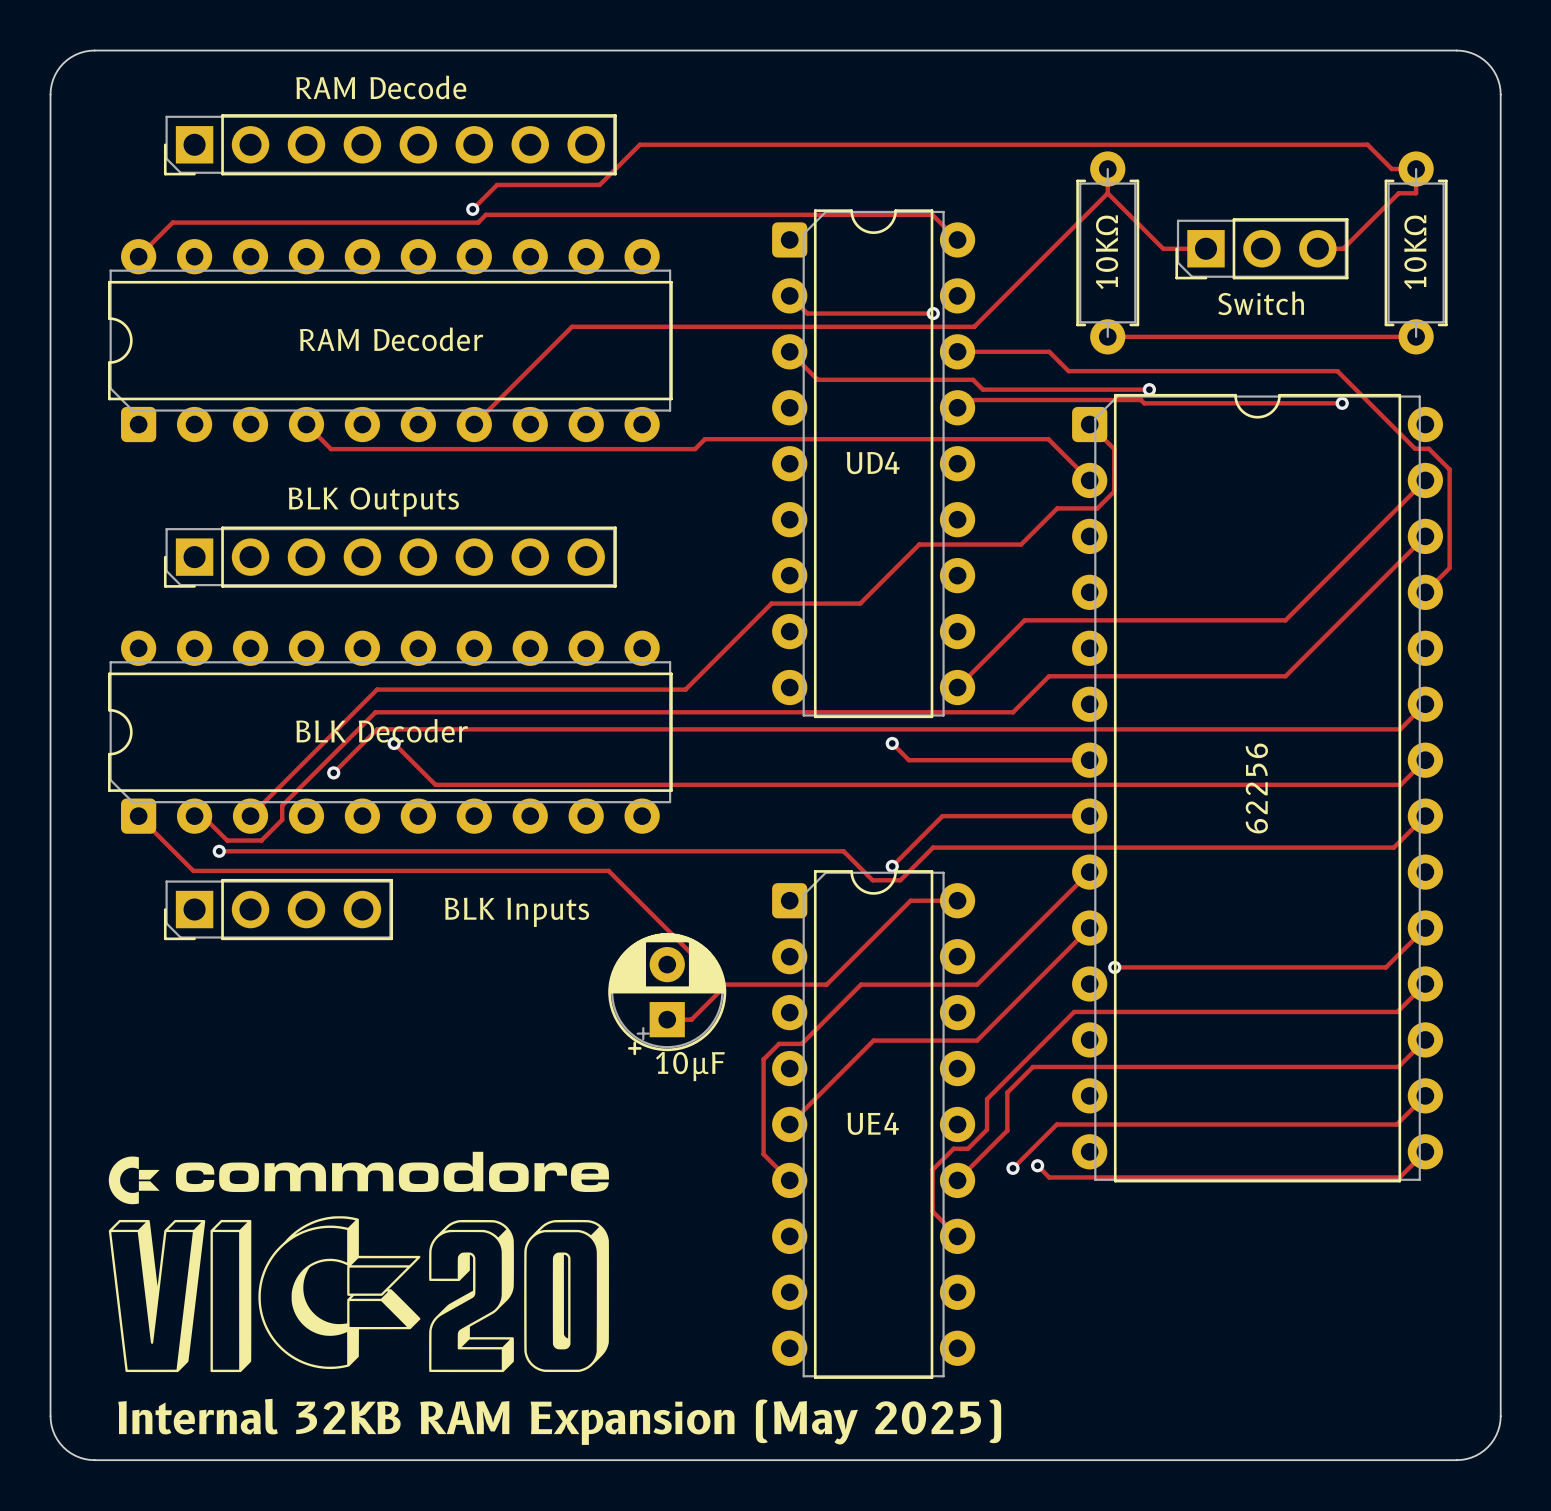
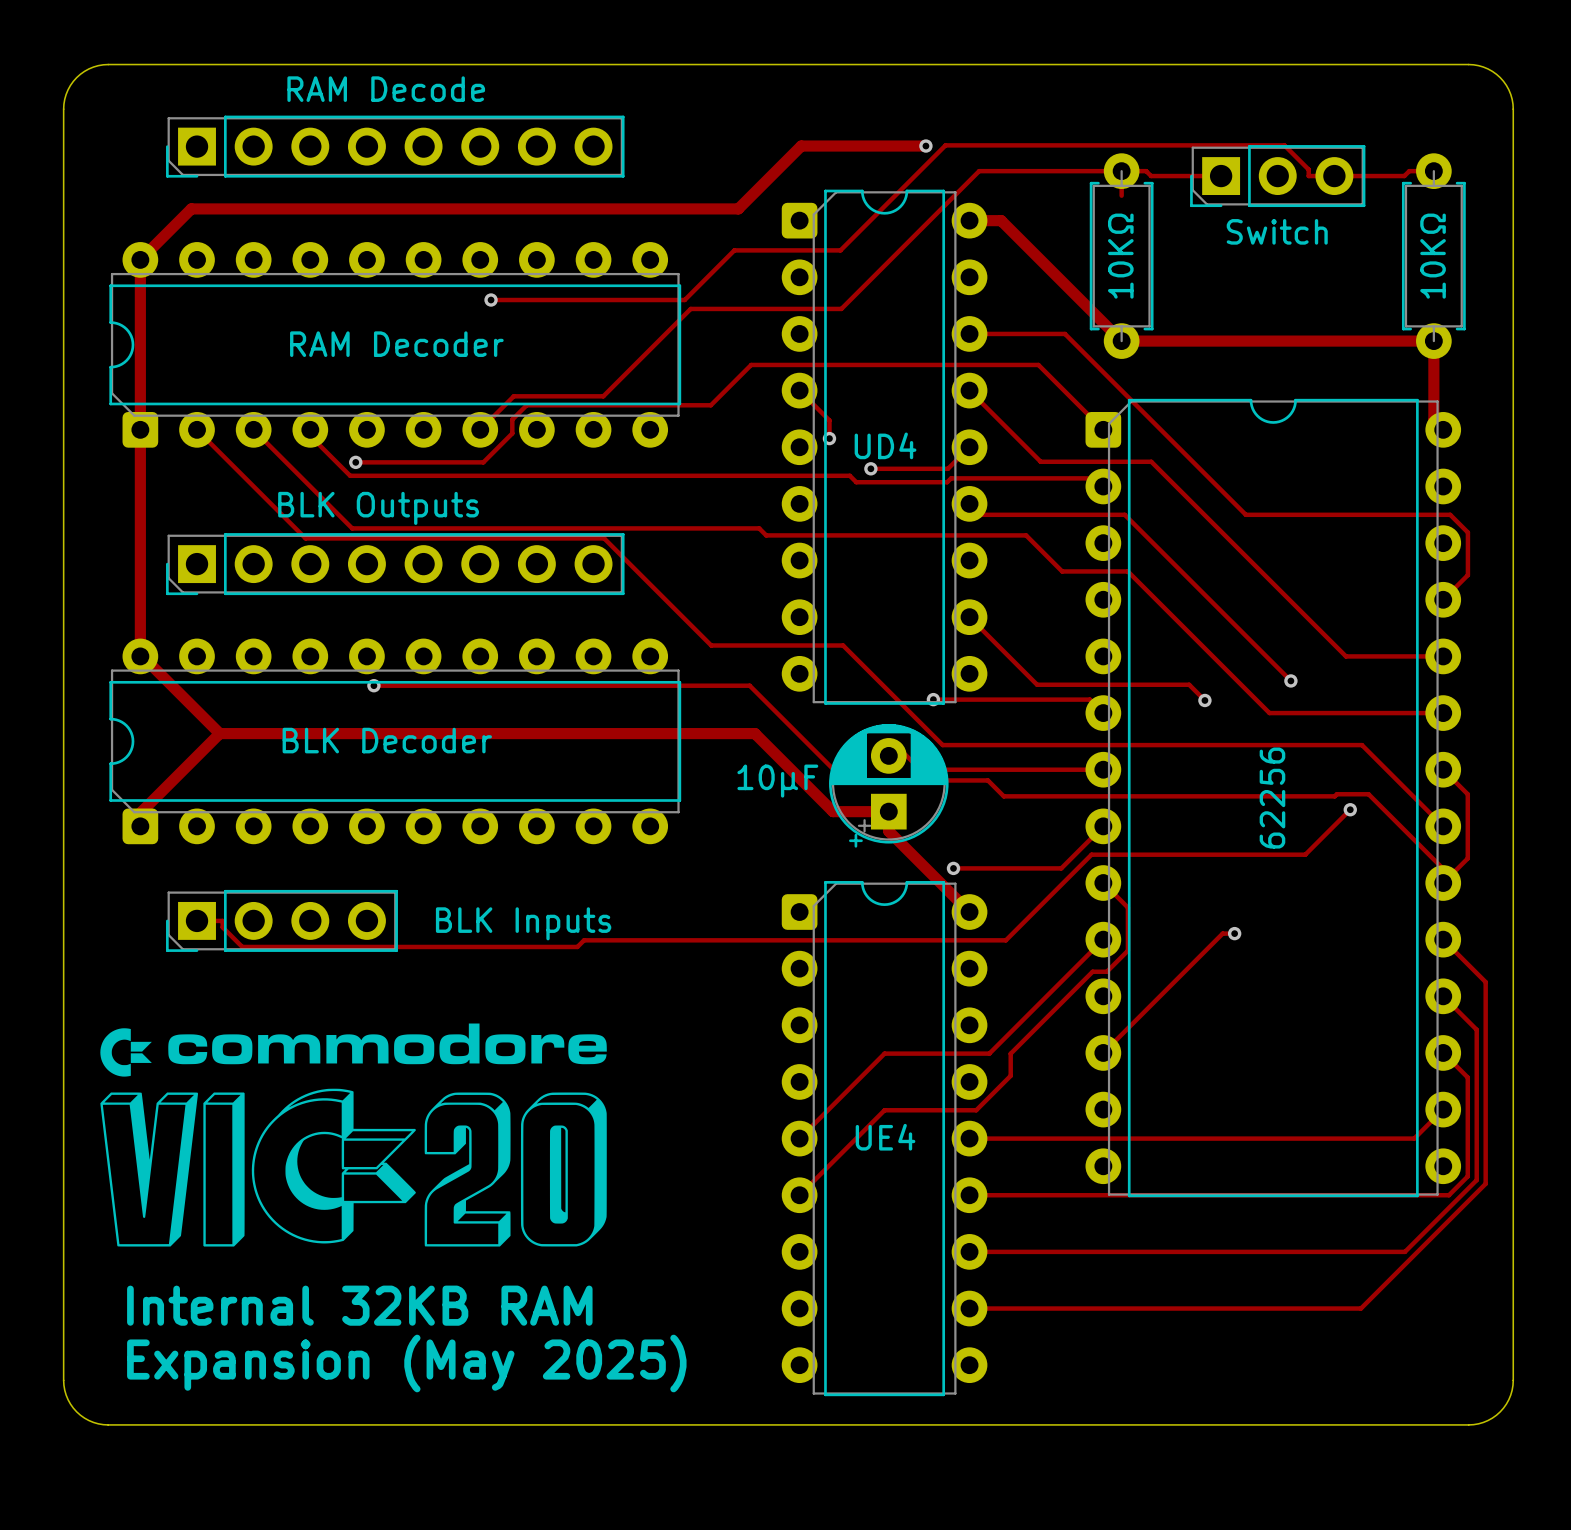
board edge: (94, 50) (1456, 50) (1471, 53) (1487, 63) (1498, 80) (1500, 94) (1500, 1416) (1498, 1430) (1487, 1447) (1471, 1457) (1456, 1460) (94, 1460) (75, 1455) (63, 1447) (54, 1435) (50, 1416) (50, 94) (54, 75) (63, 63) (80, 53) (94, 50) -> (108, 64) (88, 68) (76, 77) (66, 94) (63, 109) (63, 1380) (66, 1395) (76, 1411) (93, 1422) (108, 1424) (1468, 1424) (1483, 1422) (1500, 1411) (1510, 1395) (1513, 1380) (1513, 109) (1510, 94) (1500, 77) (1488, 68) (1468, 64) (108, 64)
via: none -> (925, 146)
track: (1391, 169) (1367, 144) (639, 144) (599, 184) (497, 184) (472, 209) -> (1409, 171) (1404, 176) (1308, 176) (1308, 169) (1284, 145) (945, 145) (840, 250) (734, 250) (684, 300) (491, 300)
track: (1416, 169) (1416, 193) (1398, 193) (1343, 248) (1317, 248) -> none
via position: (472, 209) -> (491, 300)
track: none -> (969, 220) (1001, 220) (1121, 341)
track: (172, 222) (478, 222) (486, 214) (932, 214) (957, 239) -> (174, 225) (191, 208) (738, 208) (801, 146) (925, 146)
track width: thin (172, 222) (138, 256) -> thick (174, 225) (140, 259)
track: (1205, 248) (1163, 248) (1107, 193) (974, 326) (572, 326) (507, 391) -> (1221, 176) (1151, 176) (1146, 171) (979, 171) (841, 308) (690, 308) (603, 396) (513, 396)
part position: (1261, 248) -> (1277, 176)
track: none -> (140, 259) (140, 656) (142, 656) (219, 733)
track: (789, 295) (807, 313) (933, 313) -> none
via: (933, 313) -> none
track width: thin (1107, 336) (1416, 336) -> thick (1121, 341) (1433, 341)
track: none -> (1433, 341) (1433, 420) (1443, 429)
track: (789, 351) (817, 379) (973, 379) (982, 389) (1149, 389) -> none
track: (957, 351) (1049, 351) (1068, 371) (1337, 371) (1415, 448) (1428, 448) (1449, 469) (1449, 568) -> (969, 333) (1064, 333) (1245, 514) (1450, 514) (1467, 532) (1467, 575)
track: none -> (799, 390) (829, 420) (829, 438)
track: none -> (969, 390) (1040, 461) (1151, 461) (1346, 656) (1443, 656)
via: (1149, 389) -> none
track: (1342, 403) (1144, 403) (1141, 400) (965, 400) (957, 407) -> none
via: (1342, 403) -> none
track: (306, 424) (331, 449) (695, 449) (704, 439) (1048, 439) (1081, 472) -> (310, 429) (310, 435) (350, 475) (849, 475) (856, 482) (947, 482) (951, 478) (1095, 478)
track: (1089, 424) (1114, 449) (1114, 491) (1097, 508) -> (1290, 680) (1124, 514) (1111, 514)
track: none -> (1103, 429) (1038, 364) (751, 364) (710, 405) (526, 405) (512, 419) (512, 433) (483, 462) (355, 462)
via: none -> (829, 438)
track: none -> (969, 447) (947, 468) (870, 468)
via: none -> (355, 462)
via: none -> (870, 468)
part position: (873, 463) -> (884, 447)
track: (1425, 480) (1285, 620) (1024, 620) (957, 687) -> none
track: (1057, 508) (1021, 544) (919, 544) (860, 603) (771, 603) (685, 689) (377, 689) (250, 816) -> (1070, 514) (980, 514) (969, 503)
track: (1425, 536) (1285, 676) (1174, 676) -> (1204, 700) (1189, 684)
via: none -> (1290, 680)
track: (1049, 676) (1013, 712) (375, 712) (282, 805) (282, 819) (261, 840) (227, 840) (202, 816) (194, 816) -> (1062, 684) (1037, 684) (969, 617)
track: none -> (373, 685) (749, 685) (844, 780) (987, 780) (1003, 796) (1334, 796) (1336, 794) (1368, 794) (1450, 875)
via: none -> (373, 685)
track: none -> (933, 699) (1089, 699) (1103, 713)
via: none -> (1204, 700)
track: (1425, 704) (1400, 729) (377, 729) (333, 772) -> (1443, 713) (1269, 713) (1127, 571) (1062, 571) (1026, 535) (766, 535) (759, 528) (352, 528) (253, 429)
track: (394, 743) (435, 784) (1400, 784) (1425, 760) -> (1443, 883) (1467, 858) (1467, 794) (1443, 769)
via: (394, 743) -> none
via position: (892, 743) -> (933, 699)
via: (333, 772) -> none
track: none -> (1350, 809) (1305, 854) (1091, 854) (1005, 940) (584, 940) (577, 946) (242, 946) (222, 927) (222, 920) (197, 920)
via: none -> (1350, 809)
track: (138, 816) (193, 870) (608, 870) (722, 984) -> (140, 826) (140, 812) (219, 733)
track: (1089, 816) (942, 816) (892, 866) -> (1103, 826) (1061, 868) (953, 868)
track: (1425, 816) (1393, 847) (933, 847) (900, 880) (872, 880) (843, 851) (219, 851) -> (1443, 826) (1361, 745) (942, 745) (843, 645) (711, 645) (604, 538) (305, 538) (197, 429)
via: (219, 851) -> none
via position: (892, 866) -> (953, 868)
track: (1089, 872) (977, 984) (861, 984) (801, 1043) (779, 1043) (763, 1059) (763, 1154) (789, 1180) -> (1103, 883) (1127, 907) (1127, 950) (1106, 971) (1092, 971) (1010, 1053) (1010, 1075) (976, 1110) (884, 1110) (799, 1195)
track: (957, 900) (910, 900) (826, 984) (722, 984) -> (969, 912) (888, 831) (888, 811) (833, 811) (755, 733) (219, 733)
track: none -> (1234, 933) (1222, 933) (1103, 1052)
via: none -> (1234, 933)
track: (1425, 928) (1385, 967) (1114, 967) -> (1443, 939) (1485, 982) (1485, 1183) (1360, 1308) (969, 1308)
via: (1114, 967) -> none
track: (1425, 983) (1397, 1011) (1074, 1011) (987, 1099) (987, 1129) (967, 1148) (953, 1148) (932, 1169) (932, 1211) (957, 1236) -> (1443, 996) (1476, 1029) (1476, 1180) (1404, 1251) (969, 1251)
track: (722, 984) (722, 988) (691, 1019) (667, 1019) -> none
part position: (667, 994) -> (888, 785)
track: (1425, 1039) (1398, 1066) (1032, 1066) (1007, 1092) (1007, 1130) (957, 1180) -> (1443, 1052) (1467, 1077) (1467, 1176) (1448, 1195) (969, 1195)
part value position: 10µF (690, 1066) -> 10µF (777, 781)
track: (1056, 1124) (1012, 1168) -> (1070, 1138) (969, 1138)
track: (1425, 1151) (1399, 1177) (1049, 1177) (1037, 1165) -> none
via: (1037, 1165) -> none
via: (1012, 1168) -> none
drawing position: (358, 1261) -> (353, 1135)
text: none -> Internal 32KB RAM (359, 1305)
text: none -> Expansion (May 2025) (406, 1363)
text: Internal 32KB RAM Expansion (May 2025) (559, 1421) -> none

